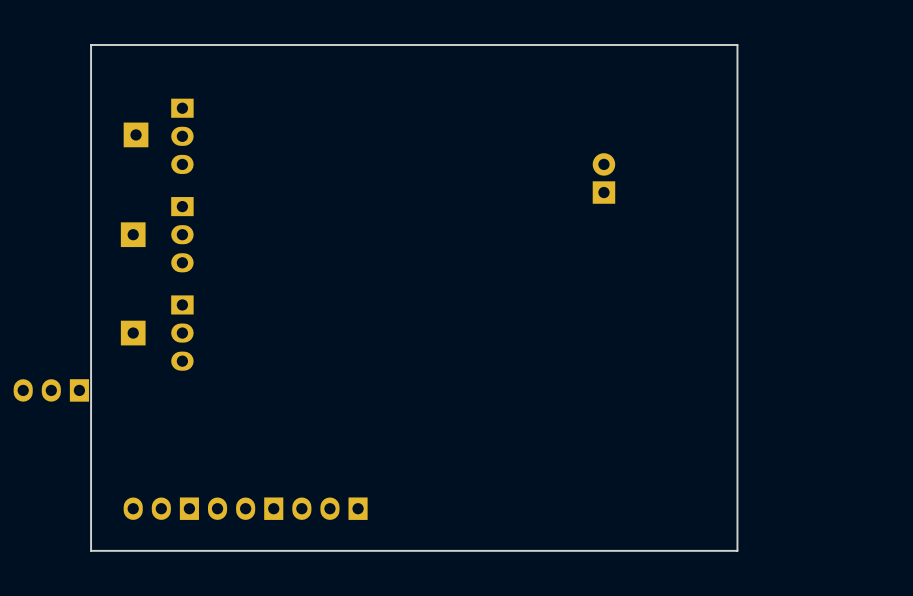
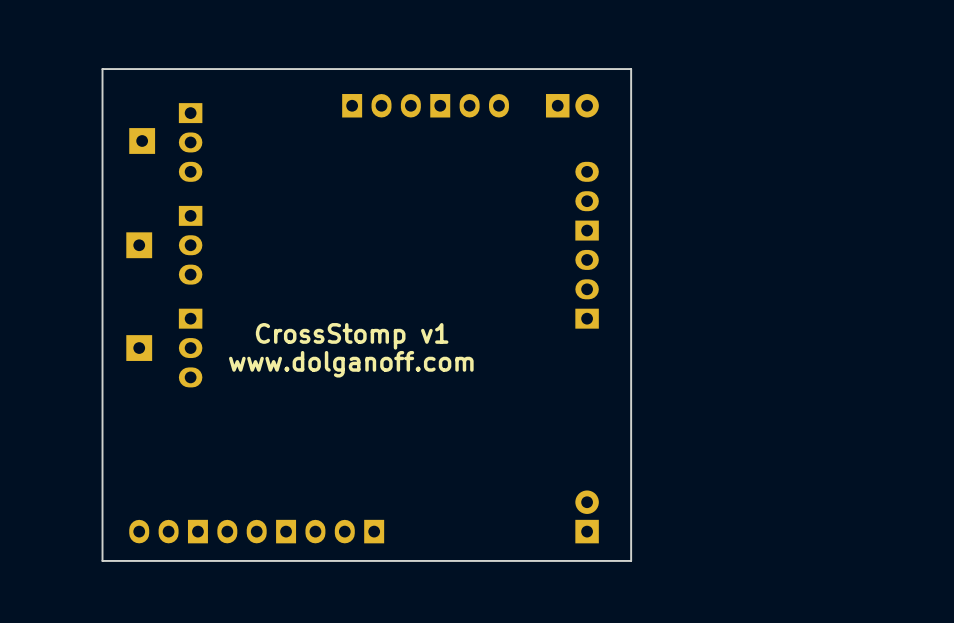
board edge: (737, 44) (737, 550) (91, 550) (91, 44) (737, 44) -> (631, 69) (631, 560) (102, 560) (102, 69) (631, 69)
part: none -> (381, 105)
part: none -> (469, 105)
part rotation: 0° (603, 178) -> 90° clockwise (572, 105)
part position: (603, 178) -> (572, 105)
part: none -> (587, 201)
part: none -> (587, 289)
text: none -> CrossStomp v1 (352, 336)
text: none -> www.dolganoff.com (351, 364)
part: (51, 390) -> none
part: none -> (587, 516)

